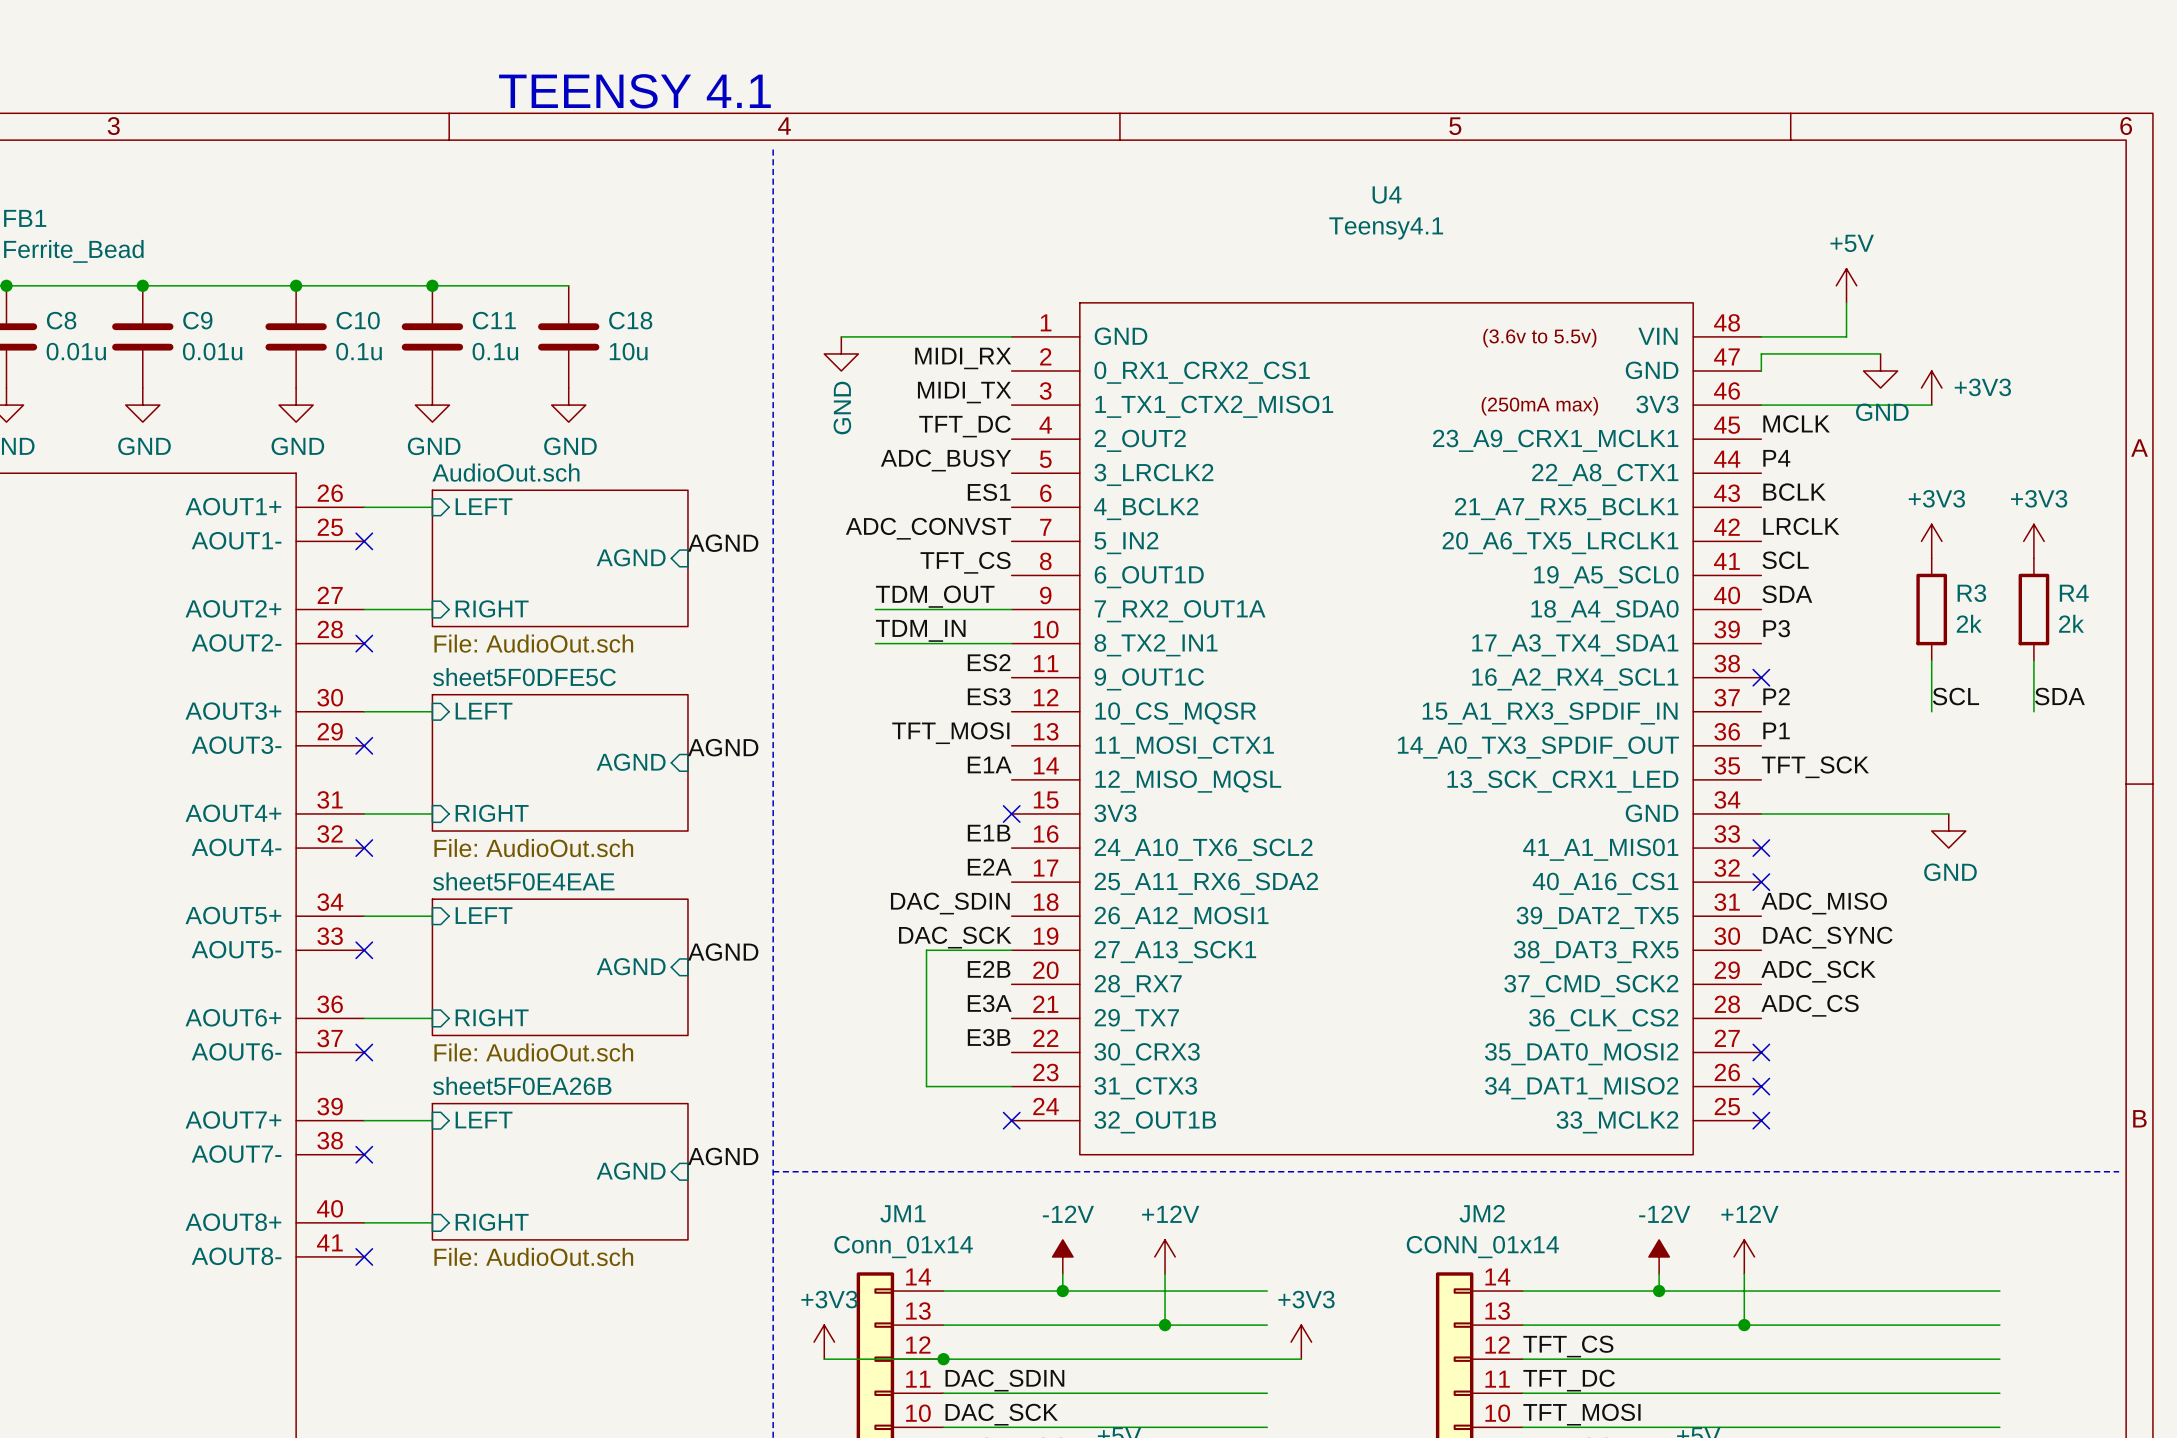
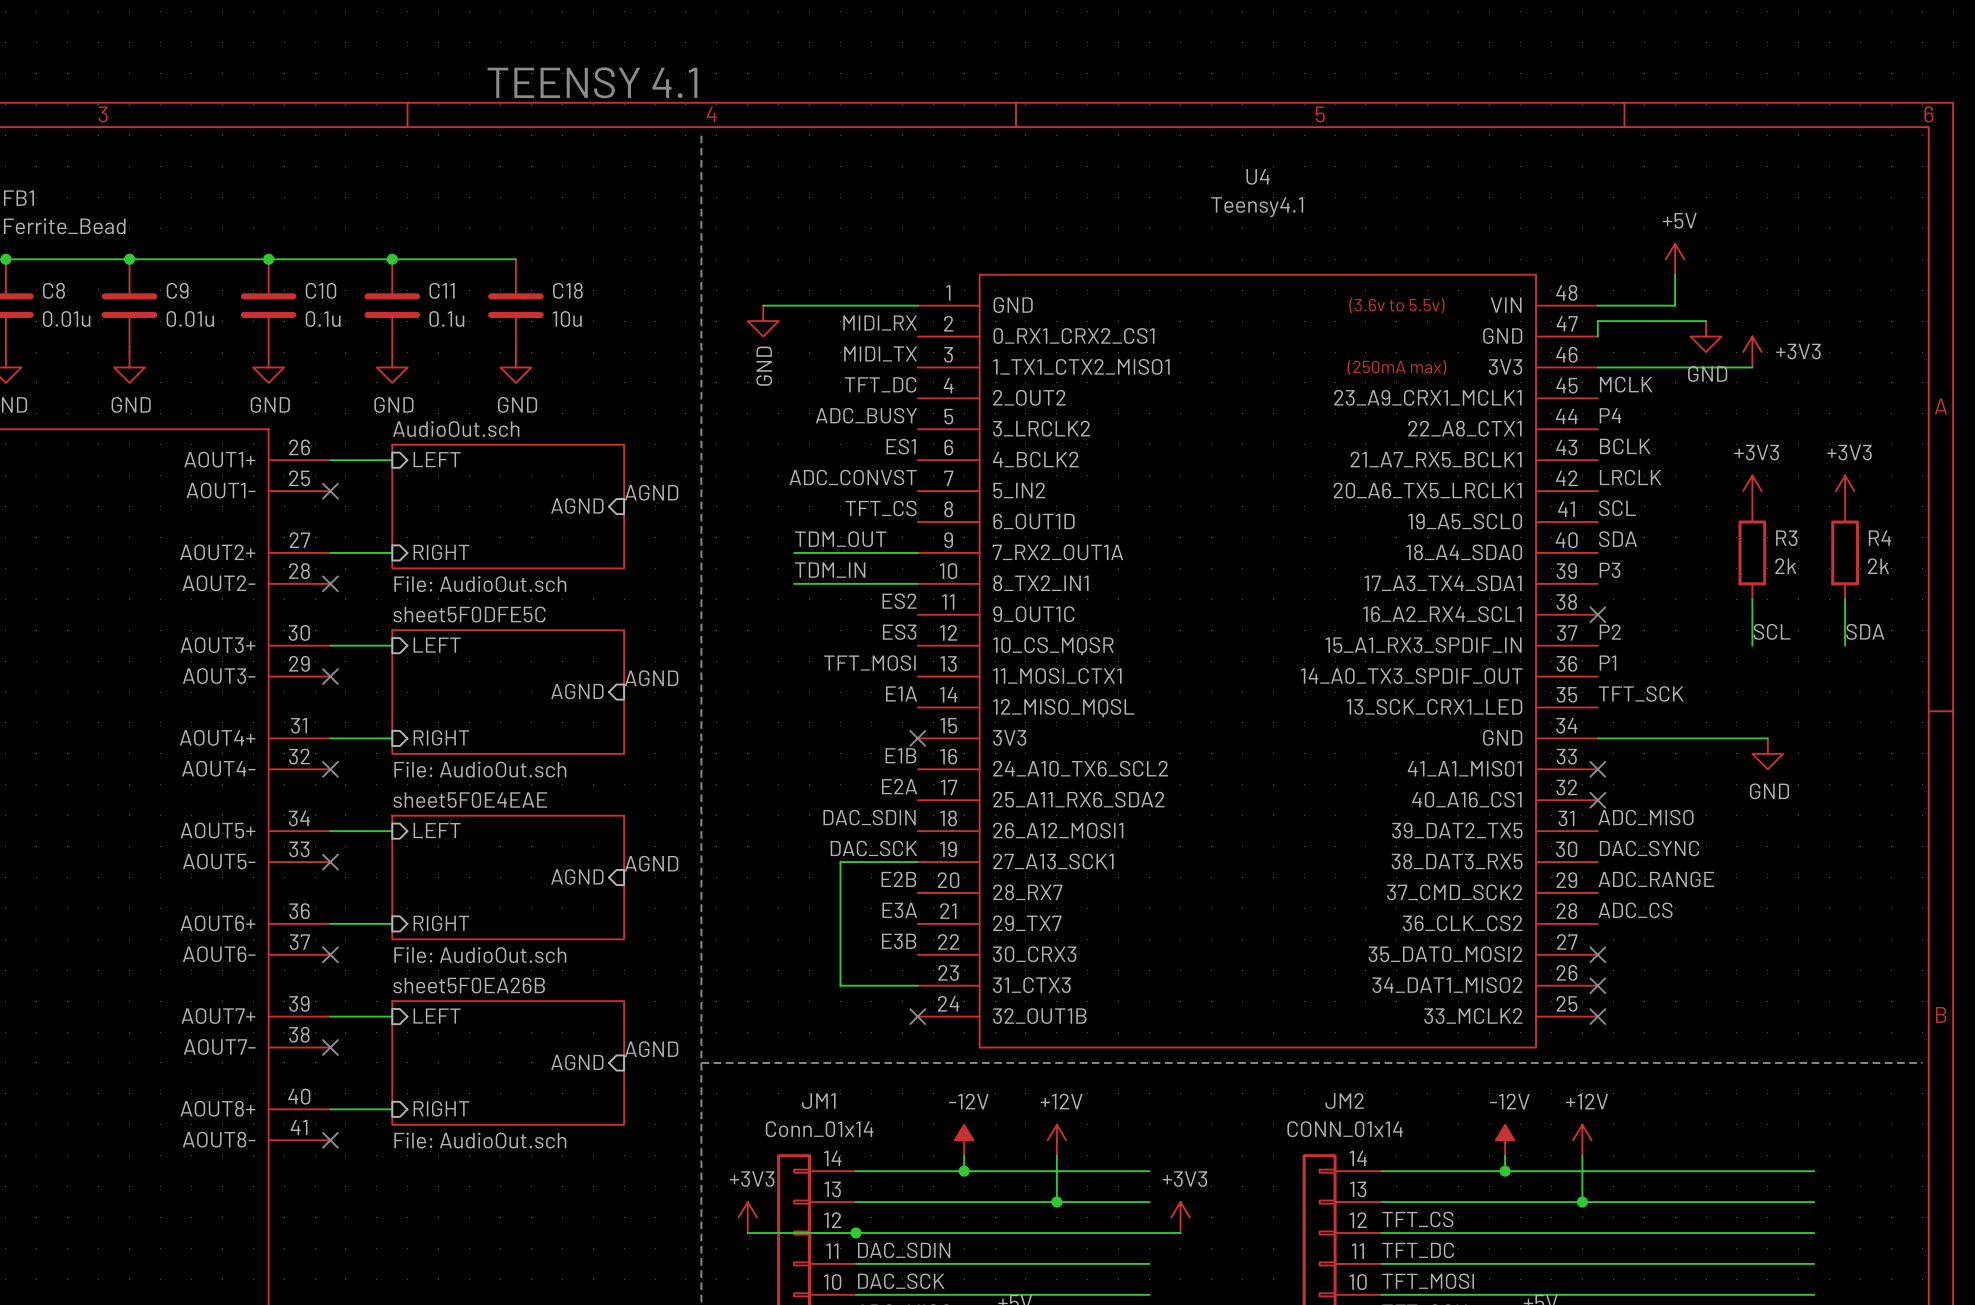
label: ADC_SCK (1818, 971) -> ADC_RANGE (1656, 879)

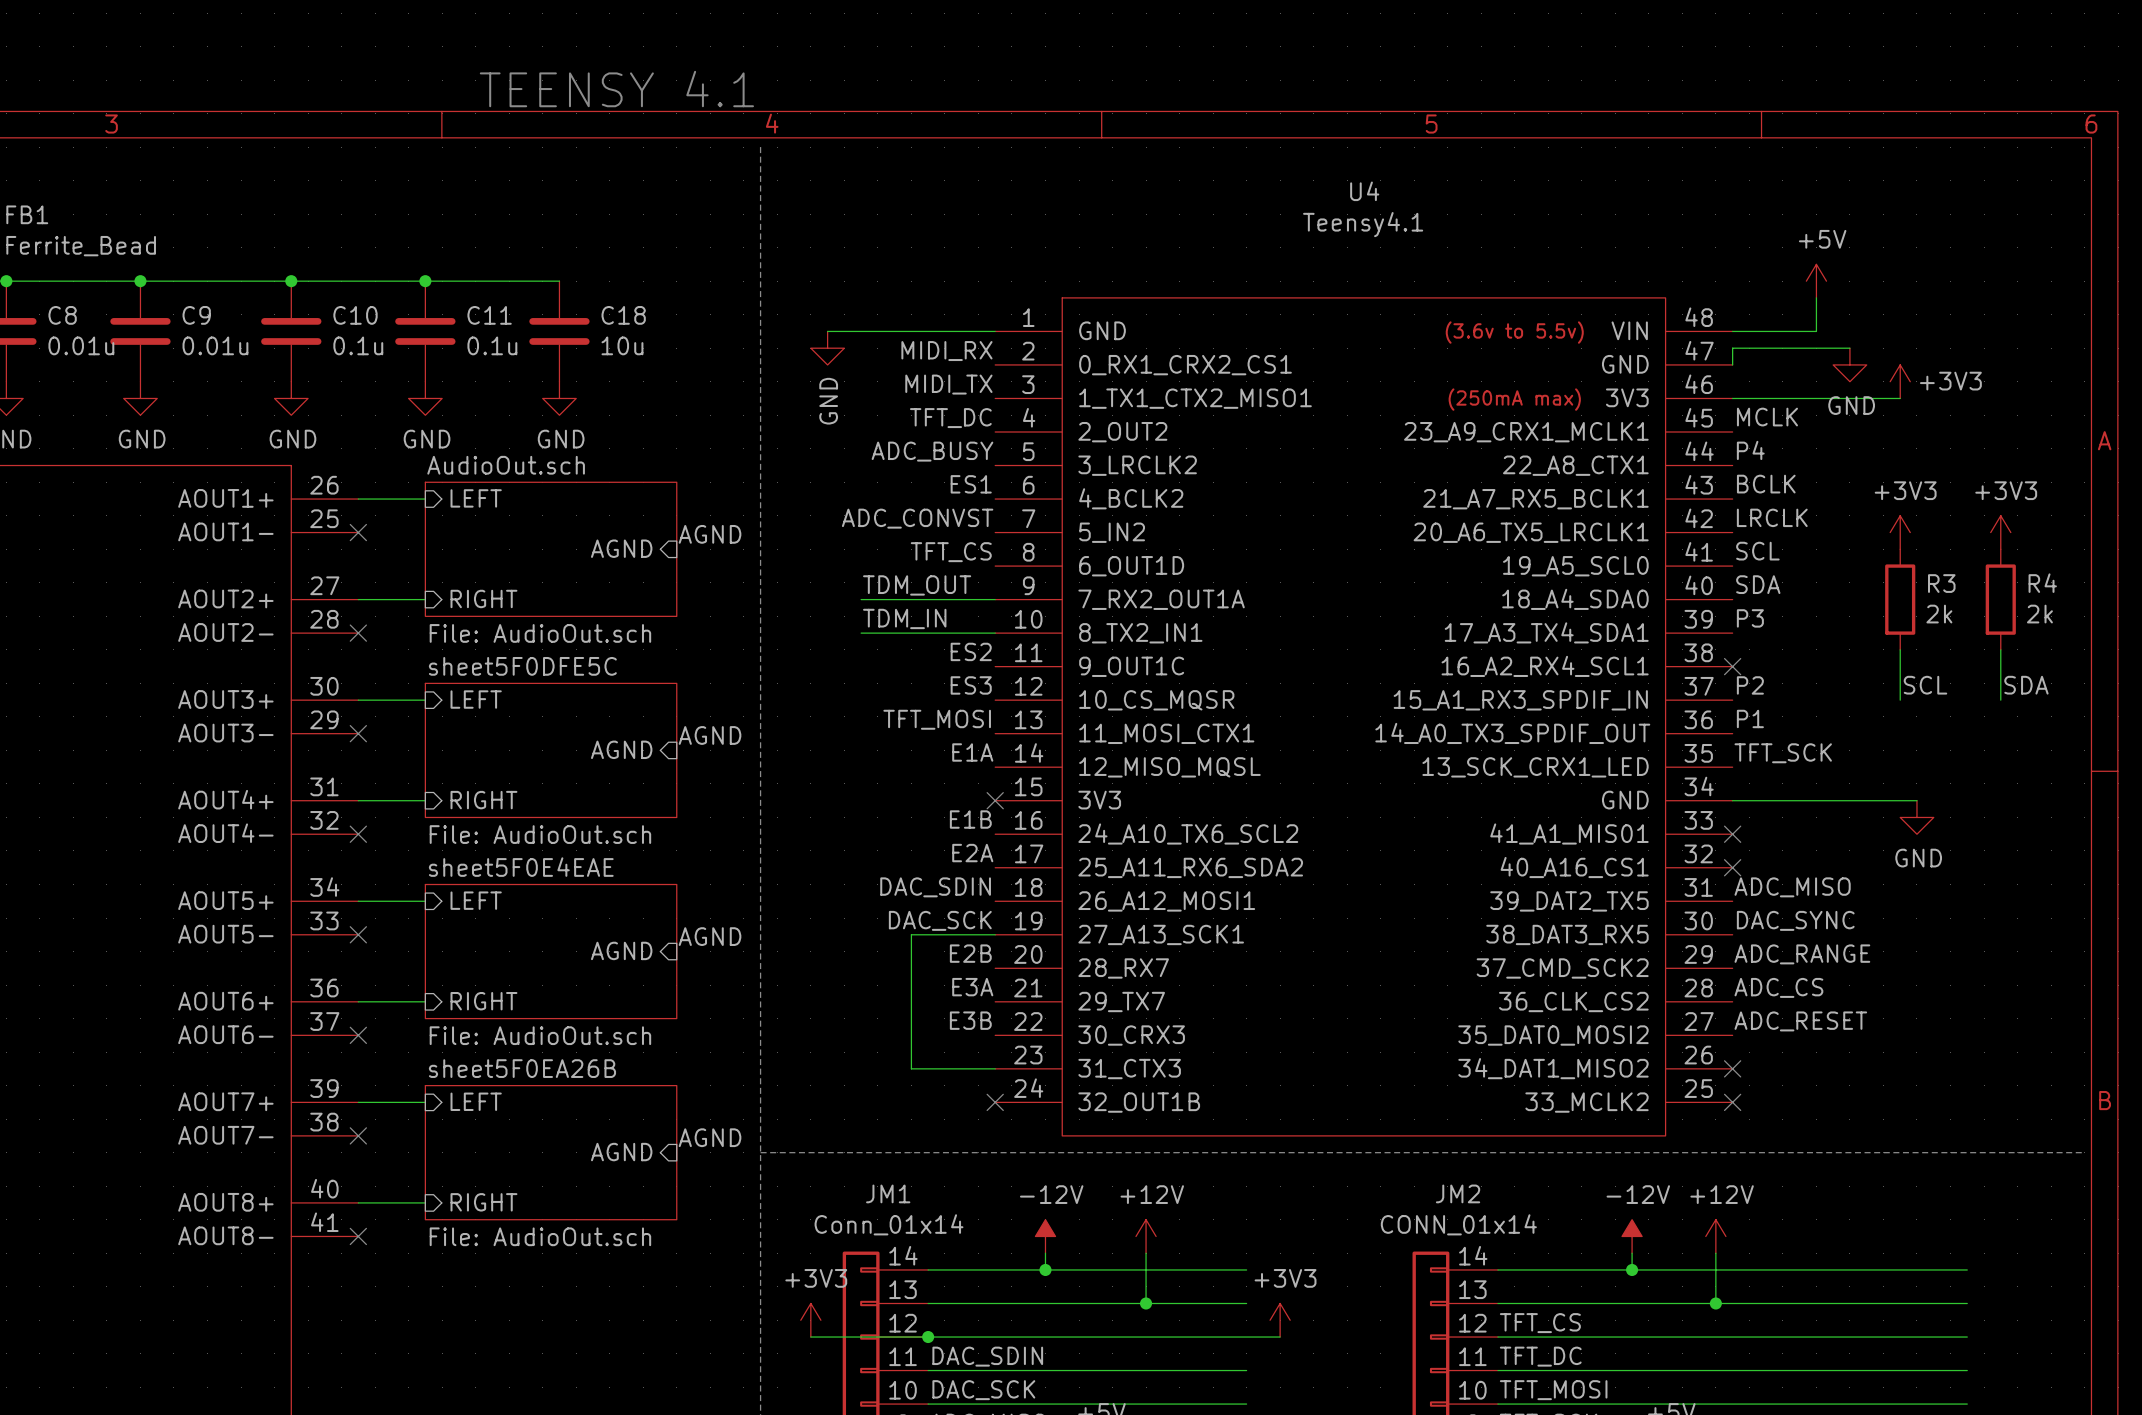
label: none -> ADC_RESET (1800, 1021)
no-connect mark: (1597, 954) -> none

